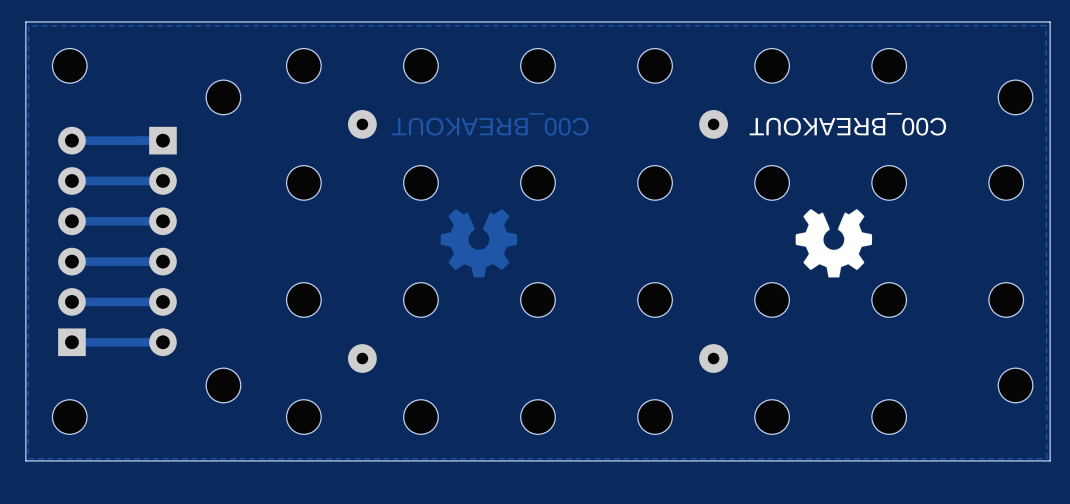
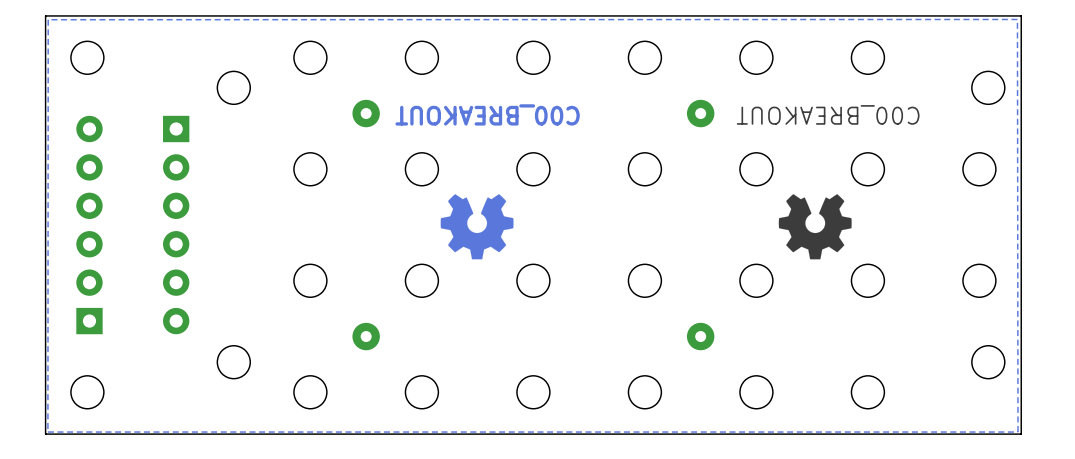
track: (162, 140) (71, 140) -> none
track: (162, 180) (71, 180) -> none
track: (162, 221) (71, 221) -> none
track: (162, 261) (71, 261) -> none
track: (162, 301) (71, 301) -> none
track: (162, 342) (71, 342) -> none

